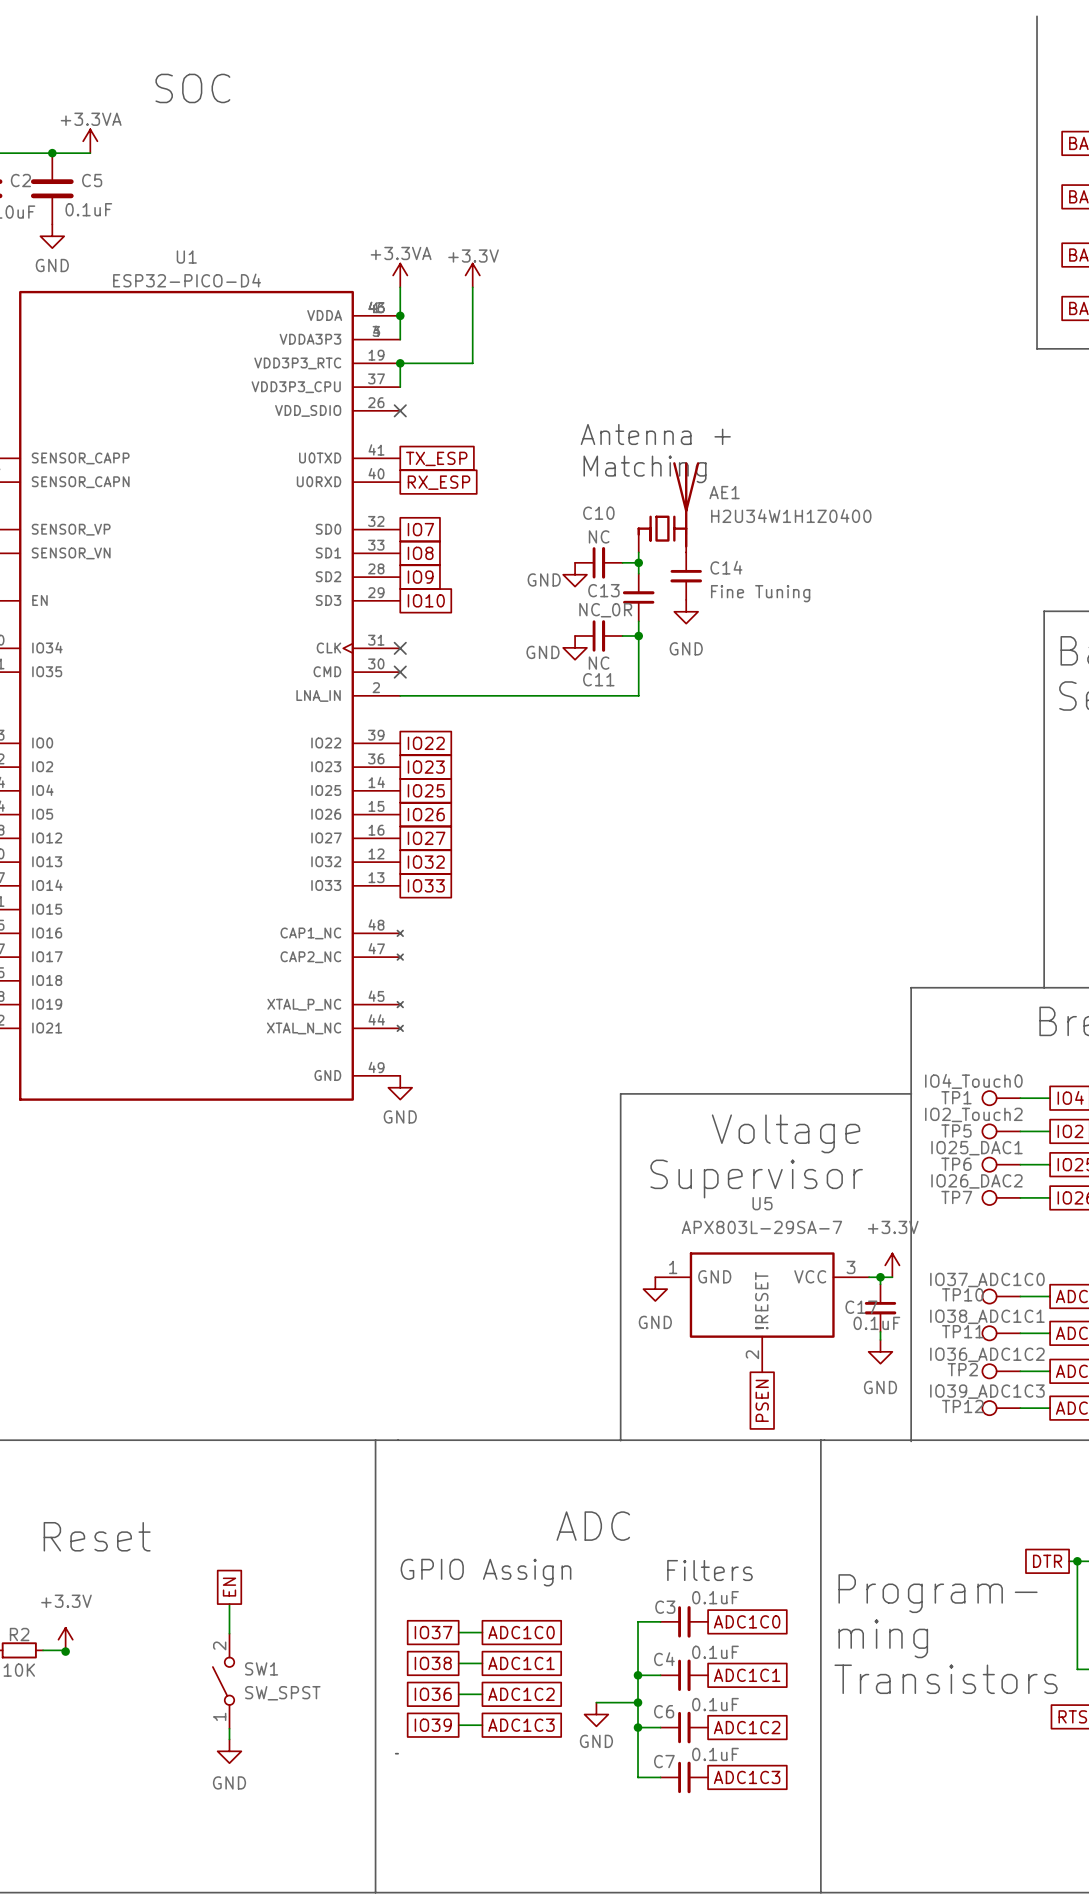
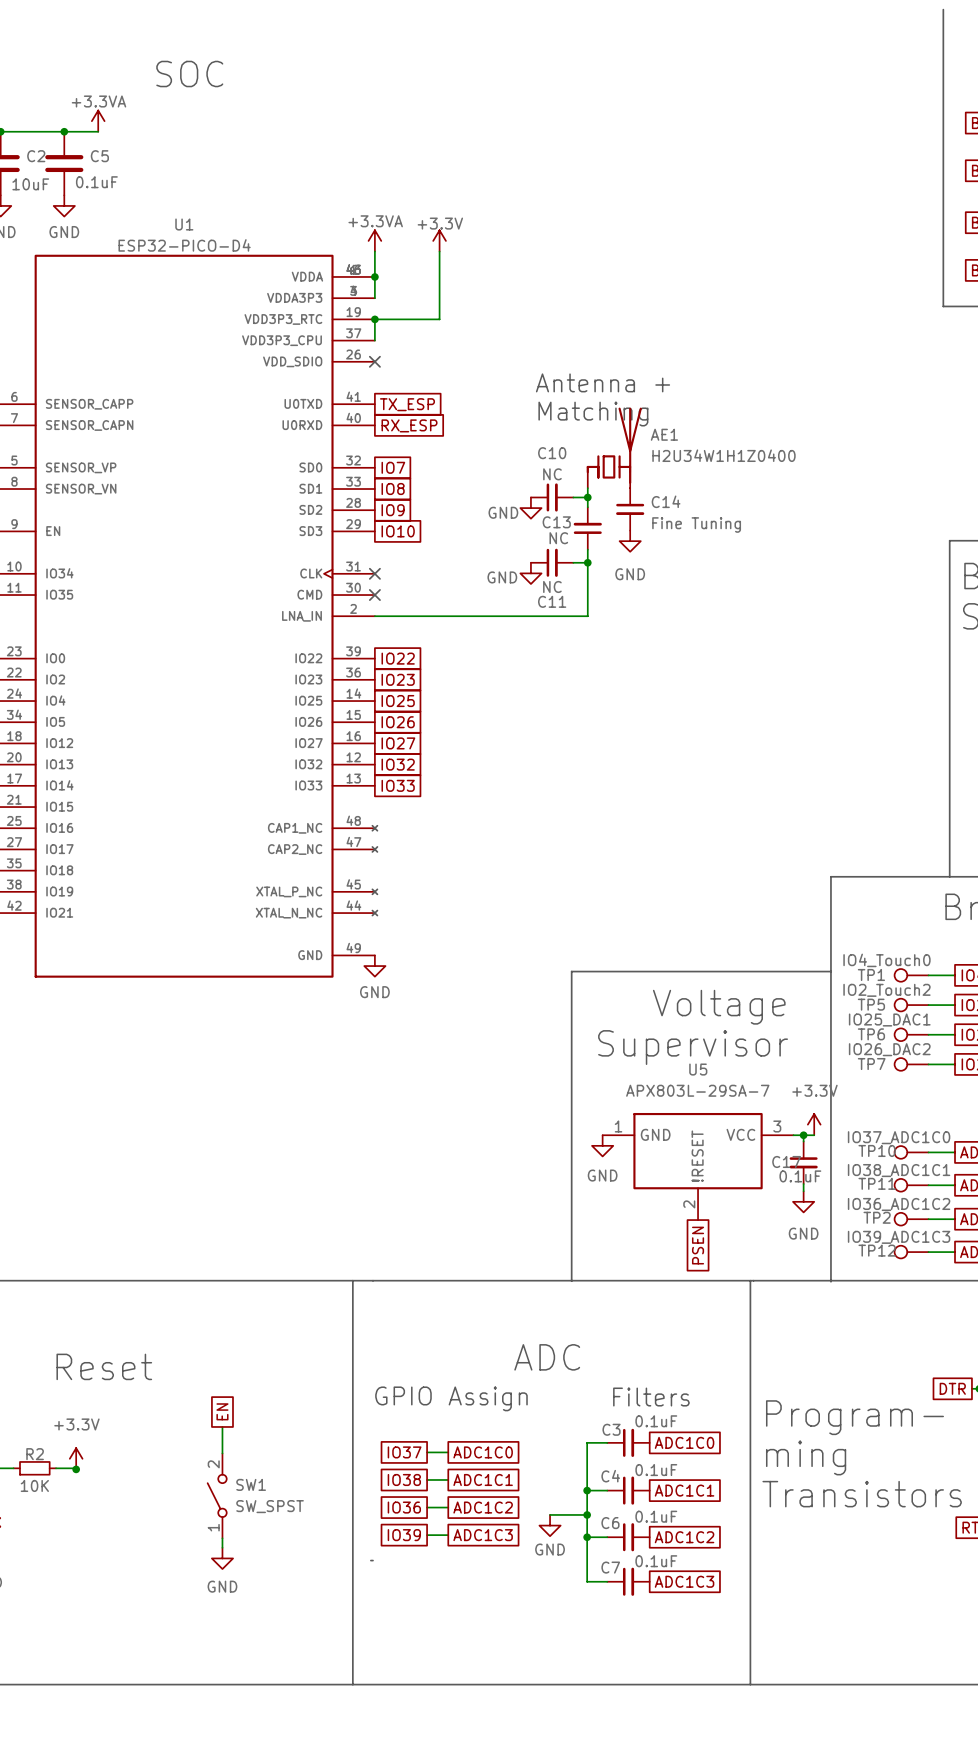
C13 value: NC_0R (605, 610) -> NC (558, 538)

